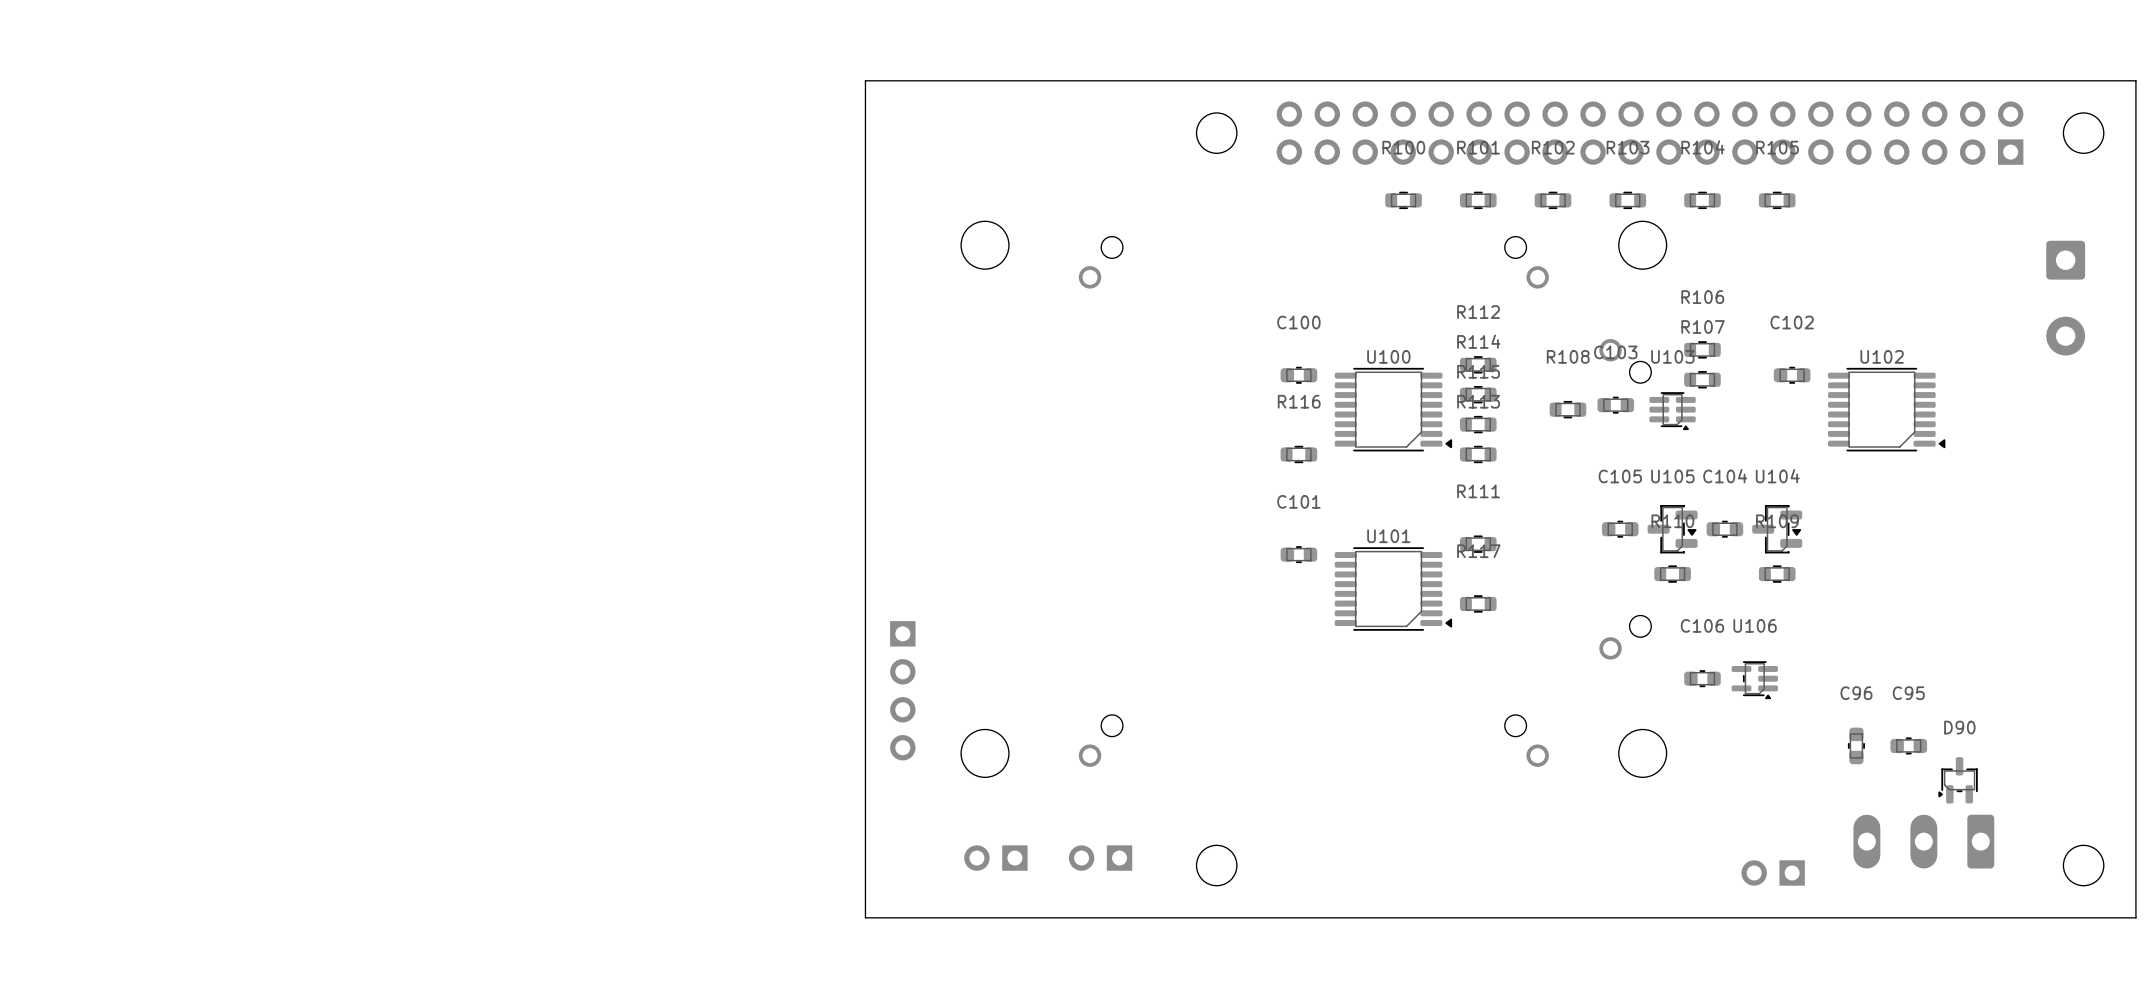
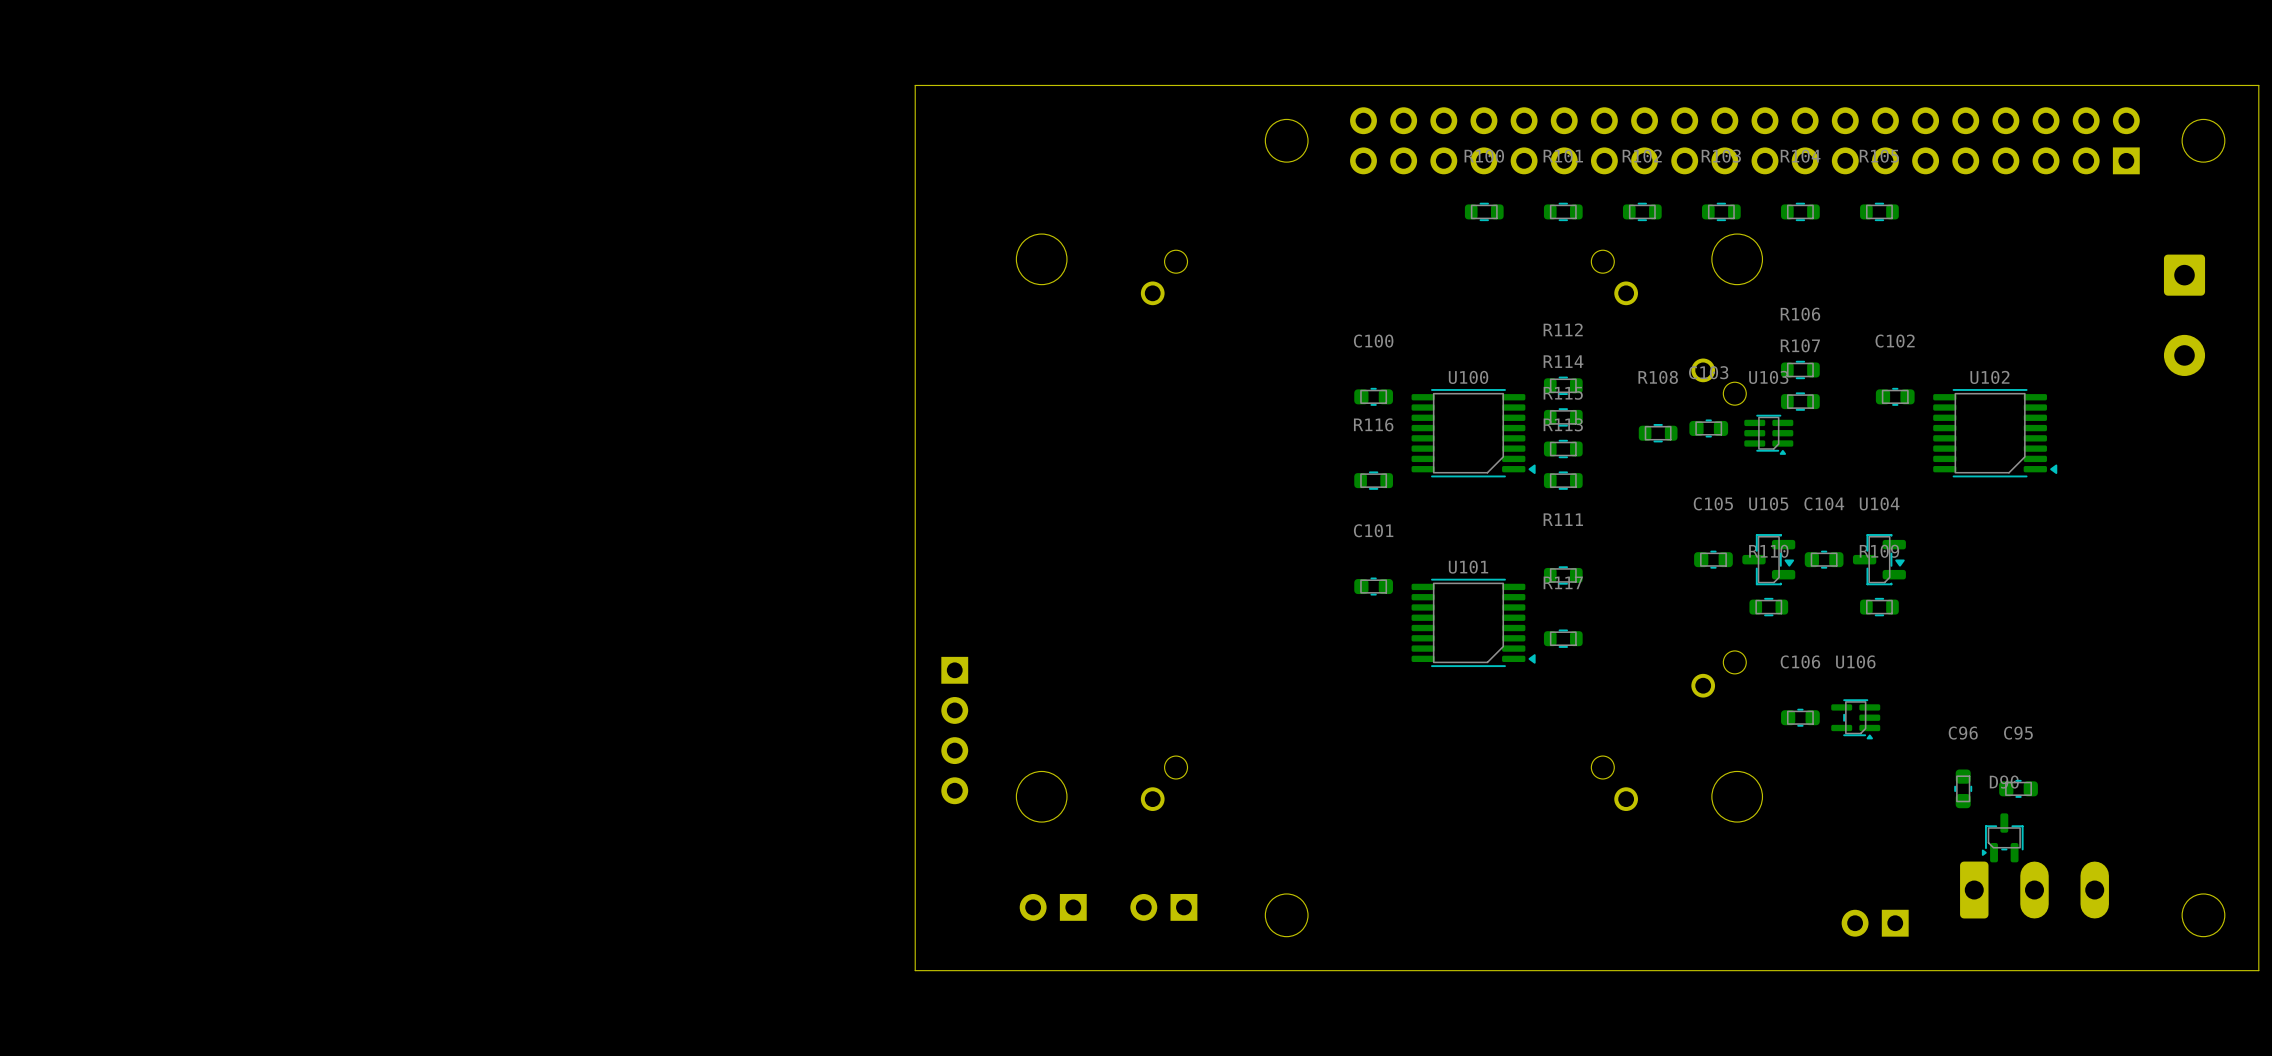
D90 position: (1958, 780) -> (2002, 837)
part rotation: 0° (1923, 841) -> 180° (2034, 890)

